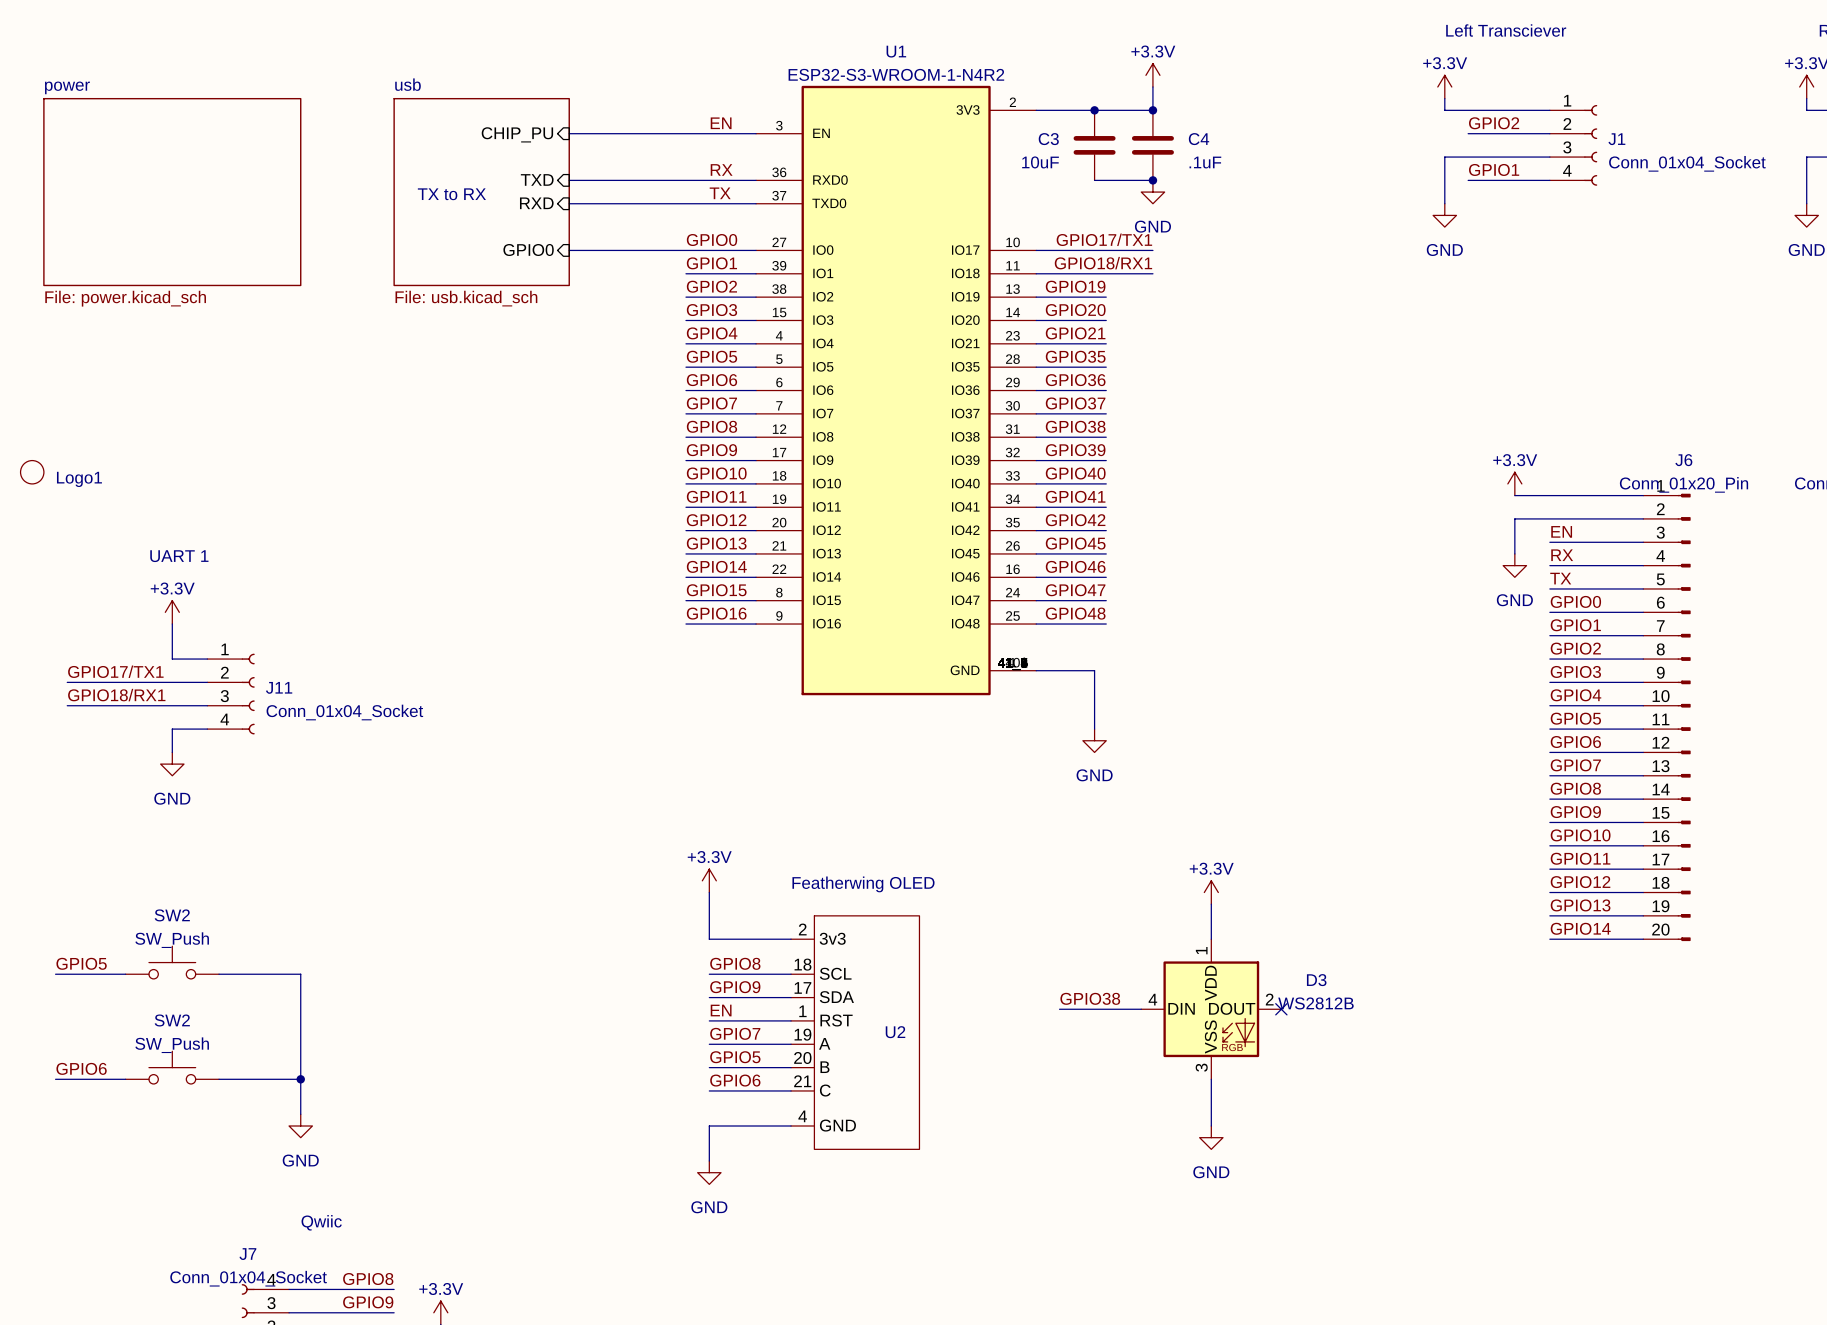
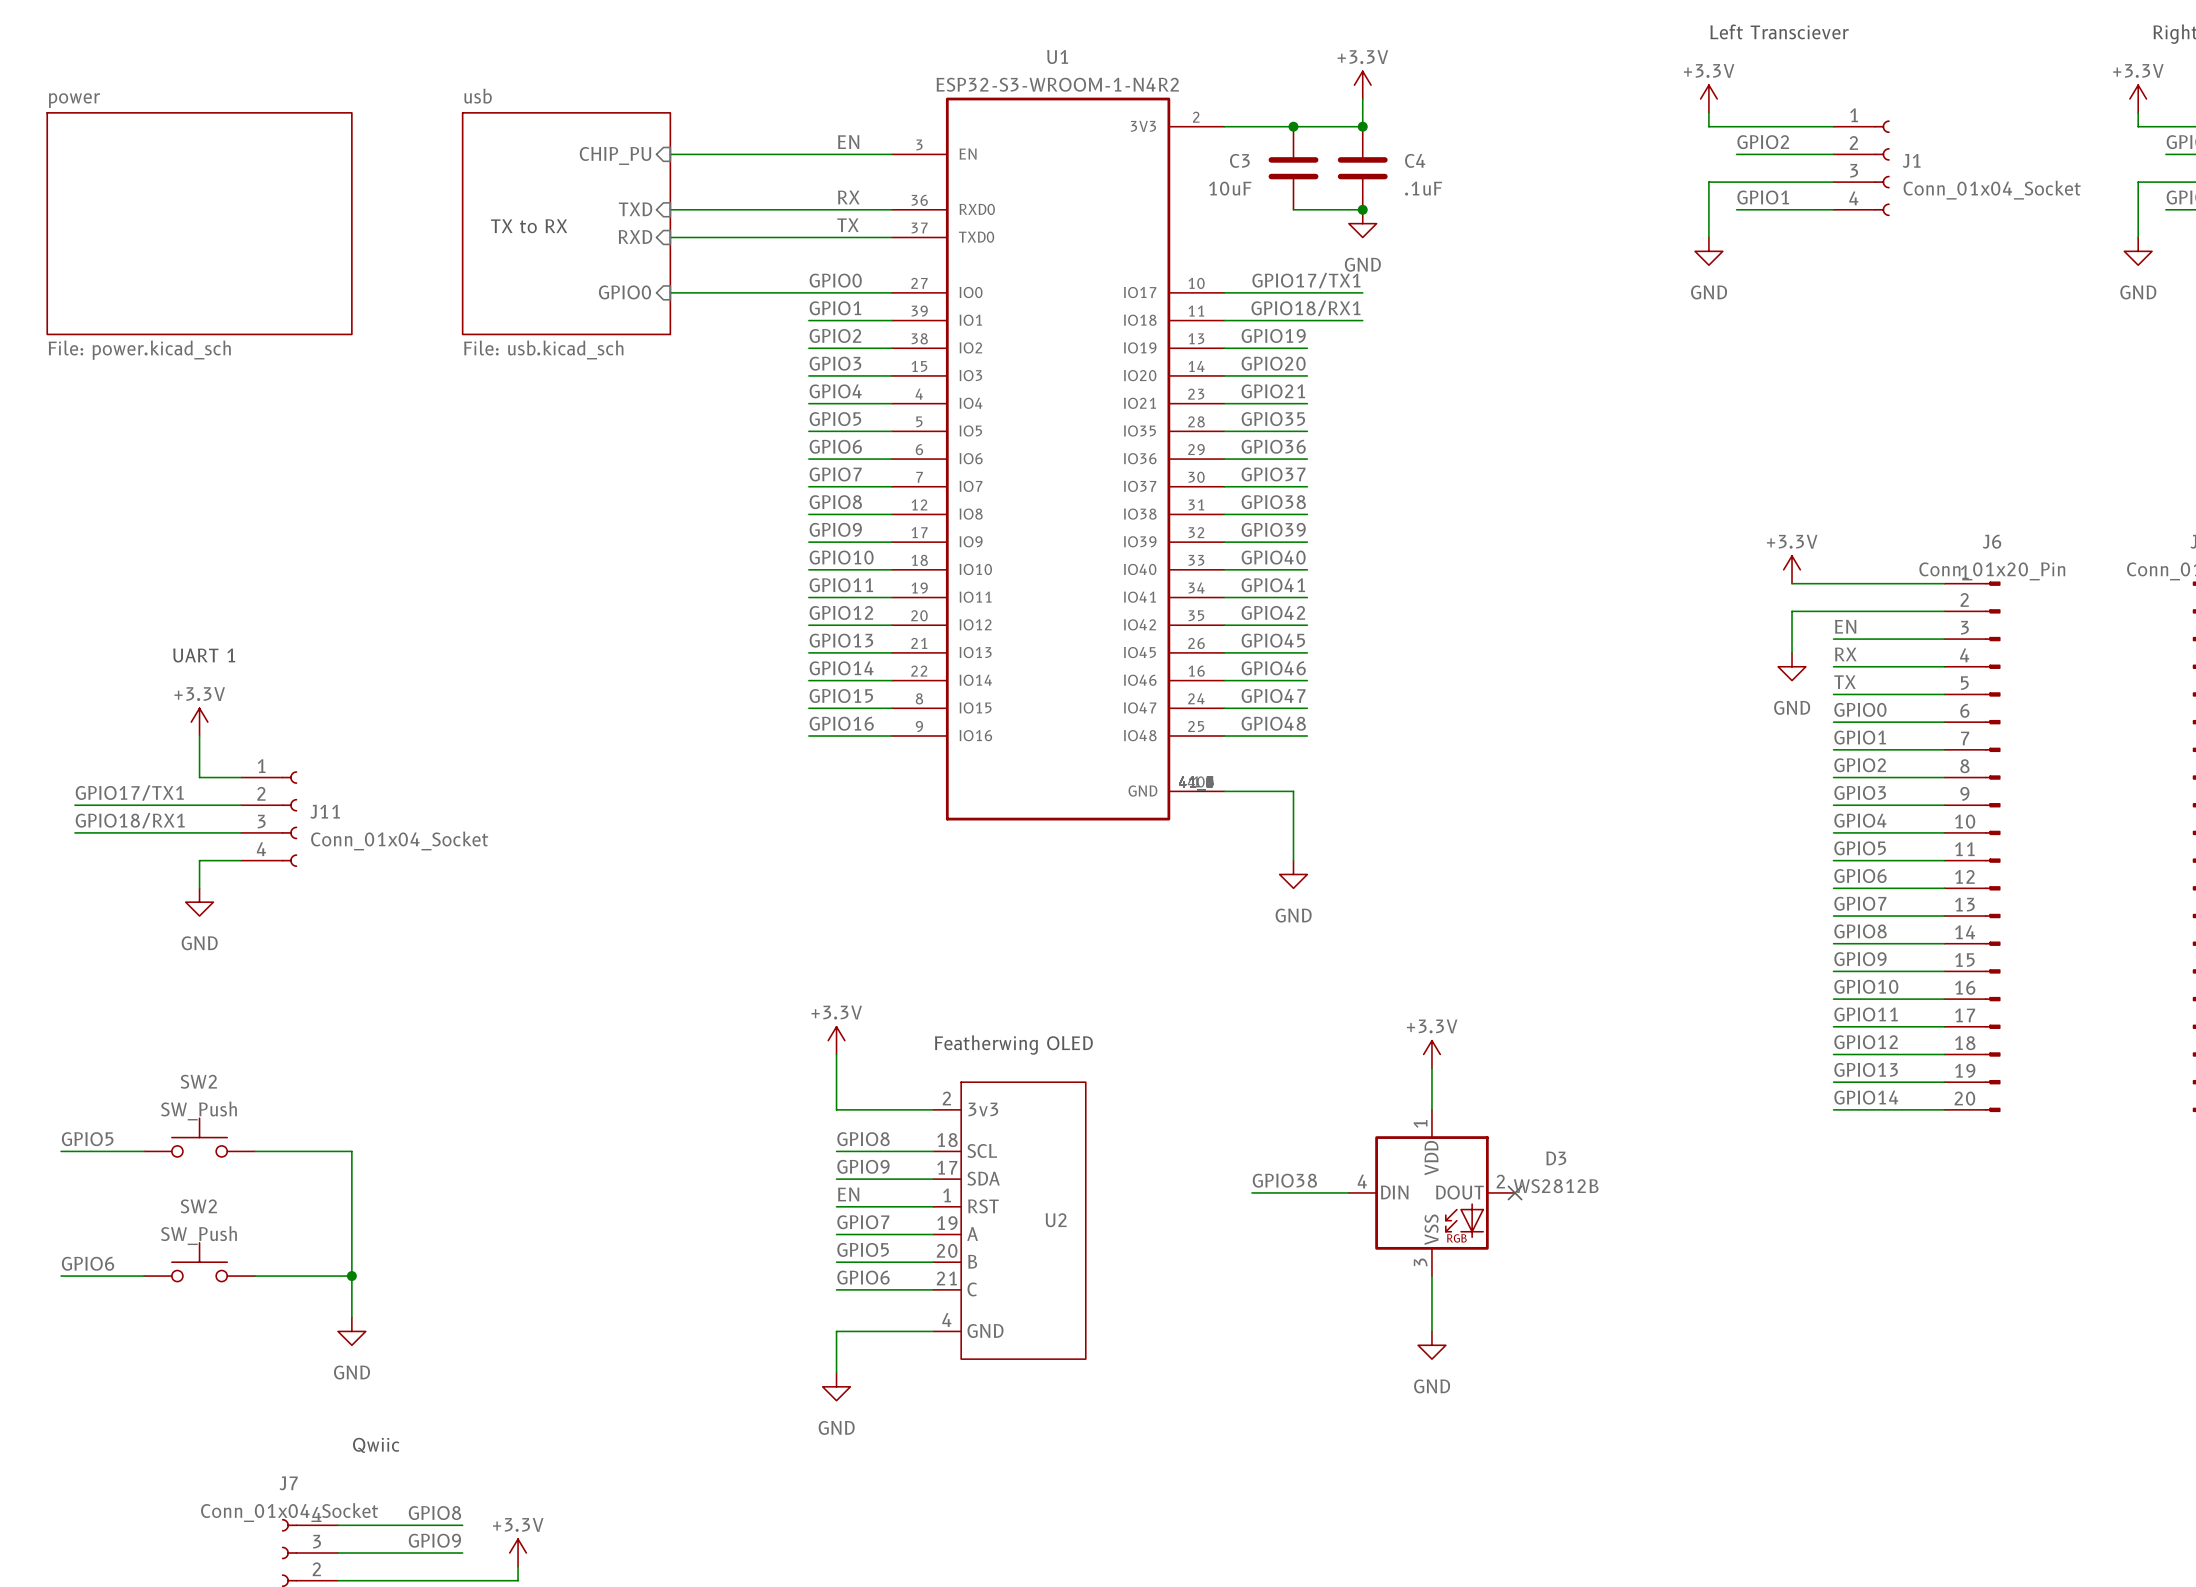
Logo1: (32, 472) -> none

